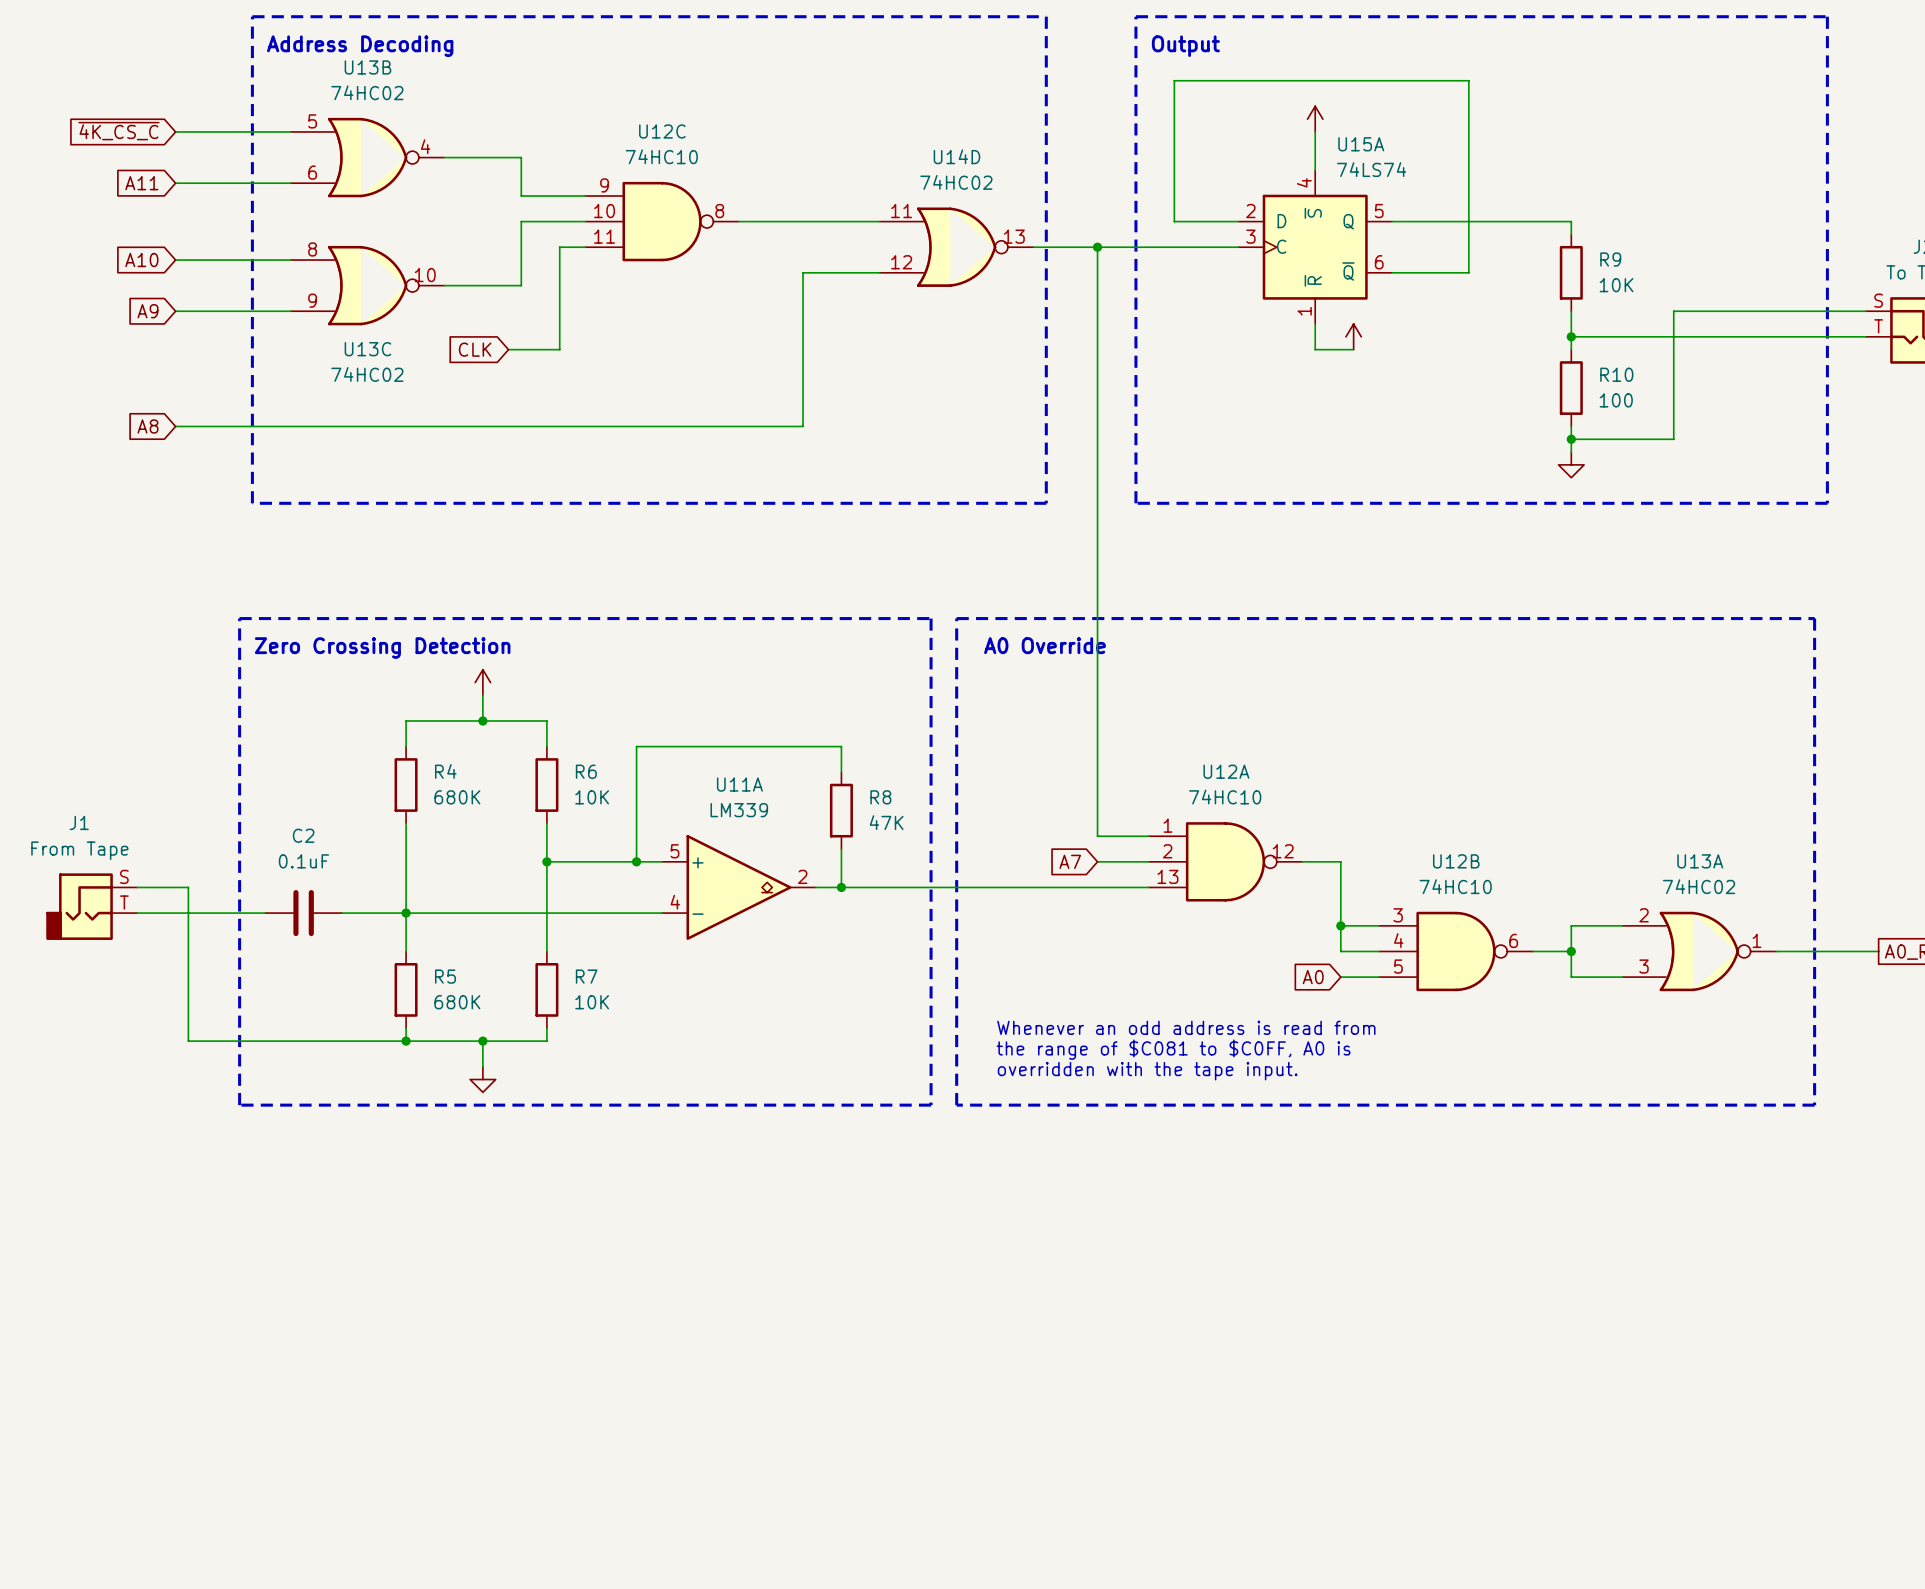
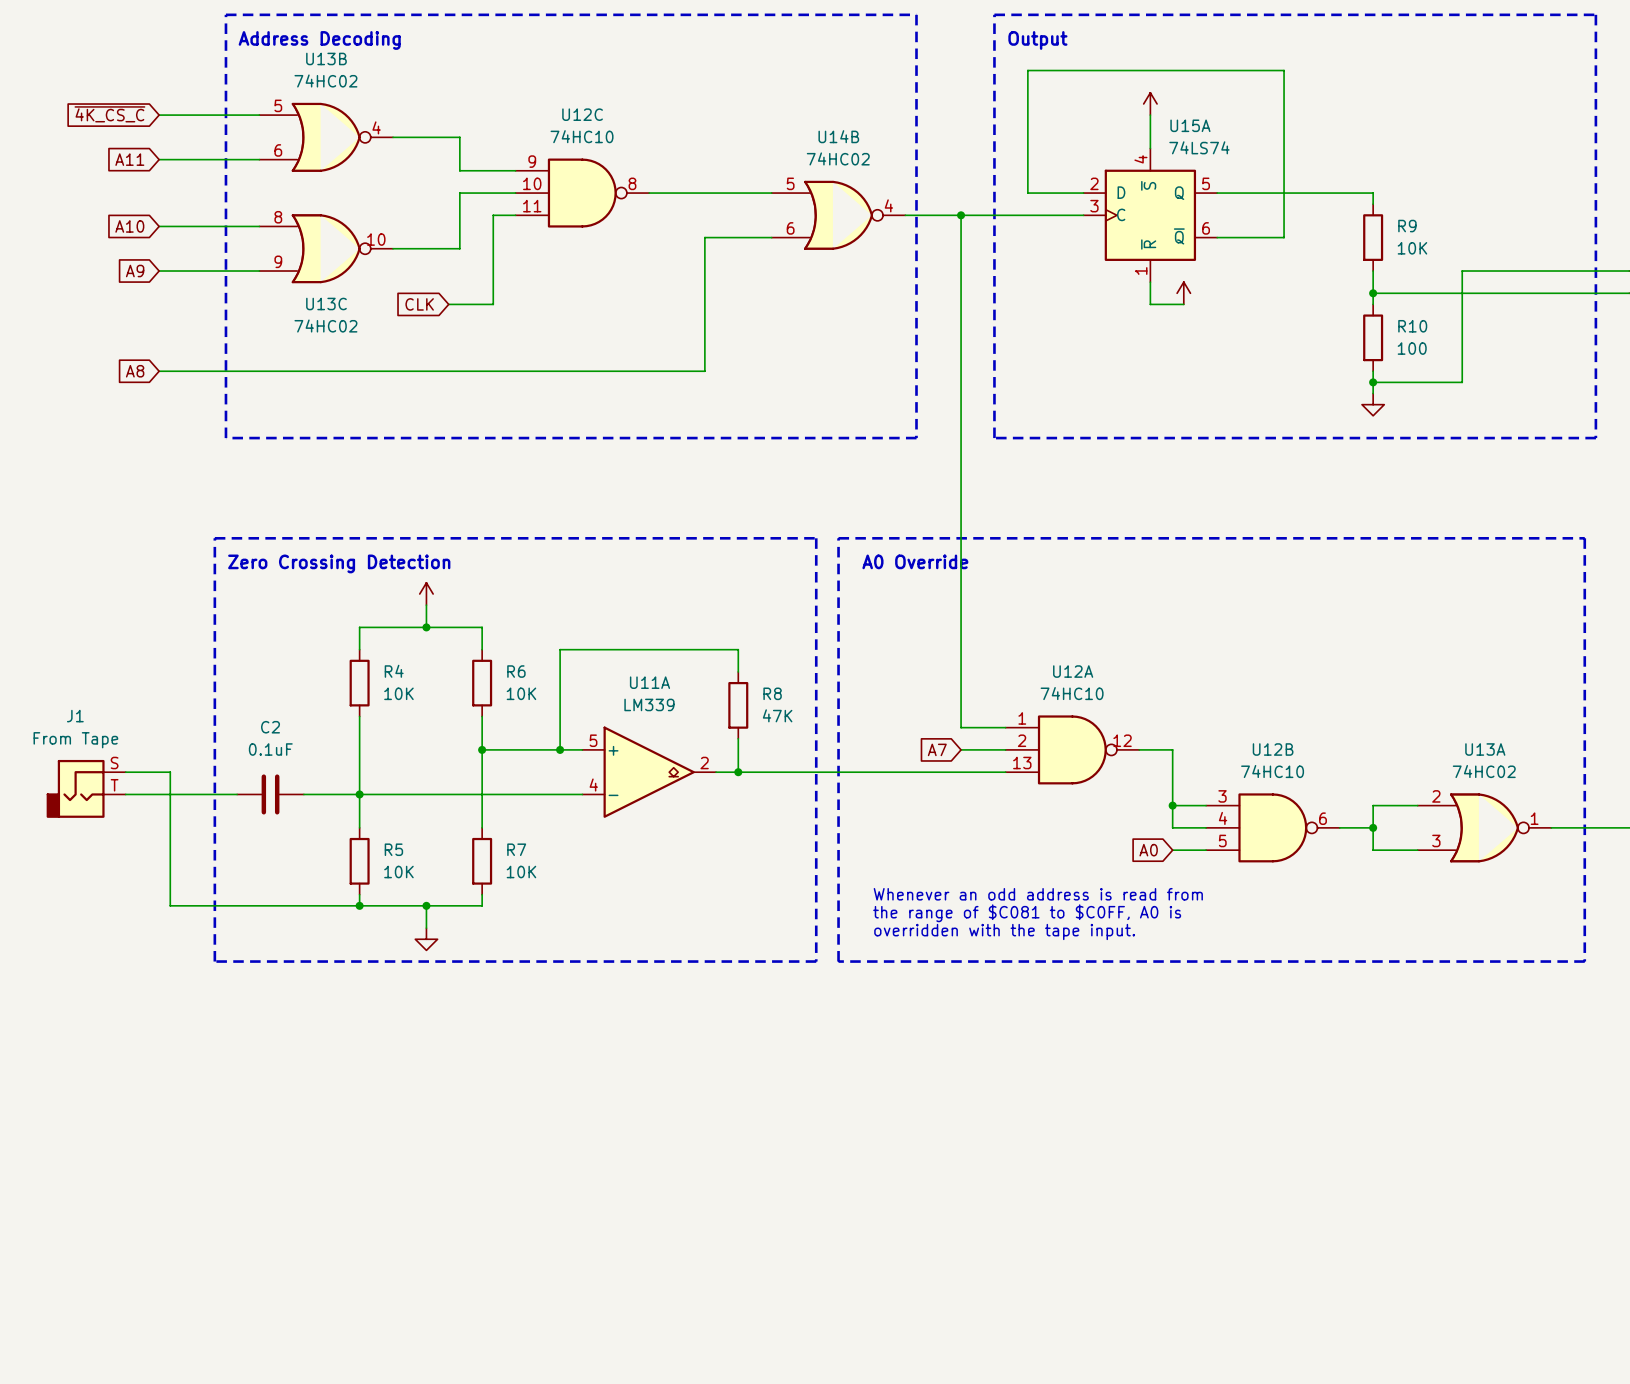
U14D name: U14D (956, 156) -> U14B (838, 136)
U14D pin number: 11 (901, 211) -> 5 (790, 183)
U14D pin number: 13 (1014, 236) -> 4 (888, 205)
U14D pin number: 12 (901, 262) -> 6 (790, 228)
R4 value: 680K (457, 797) -> 10K (398, 693)
R5 value: 680K (457, 1002) -> 10K (398, 872)

